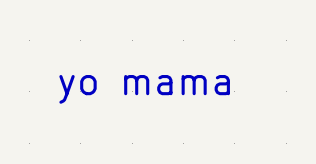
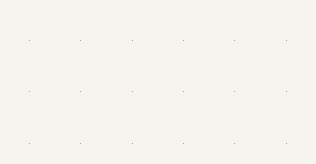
text: yo mama (144, 89) -> none

